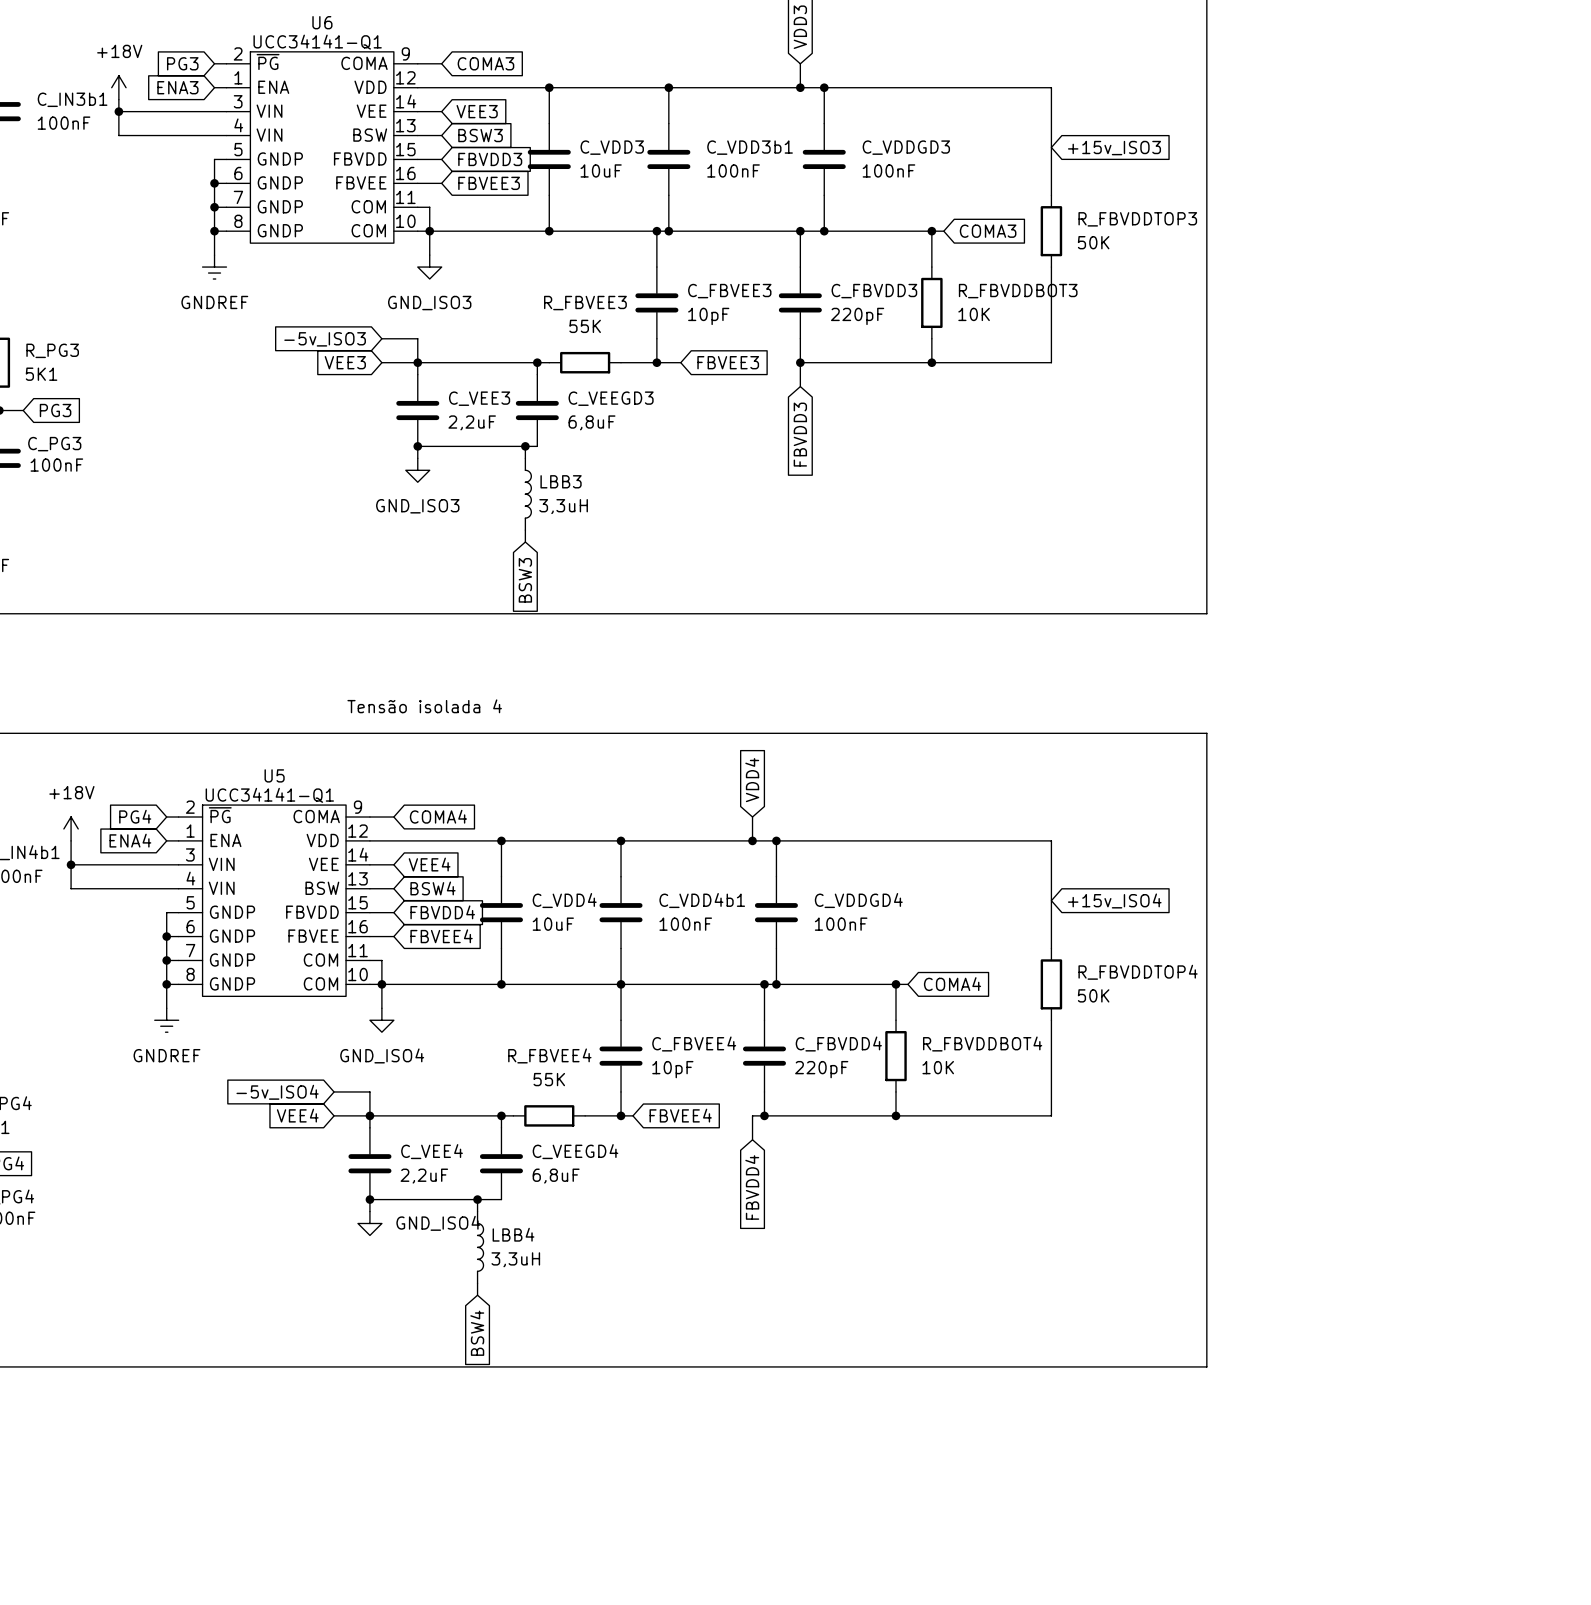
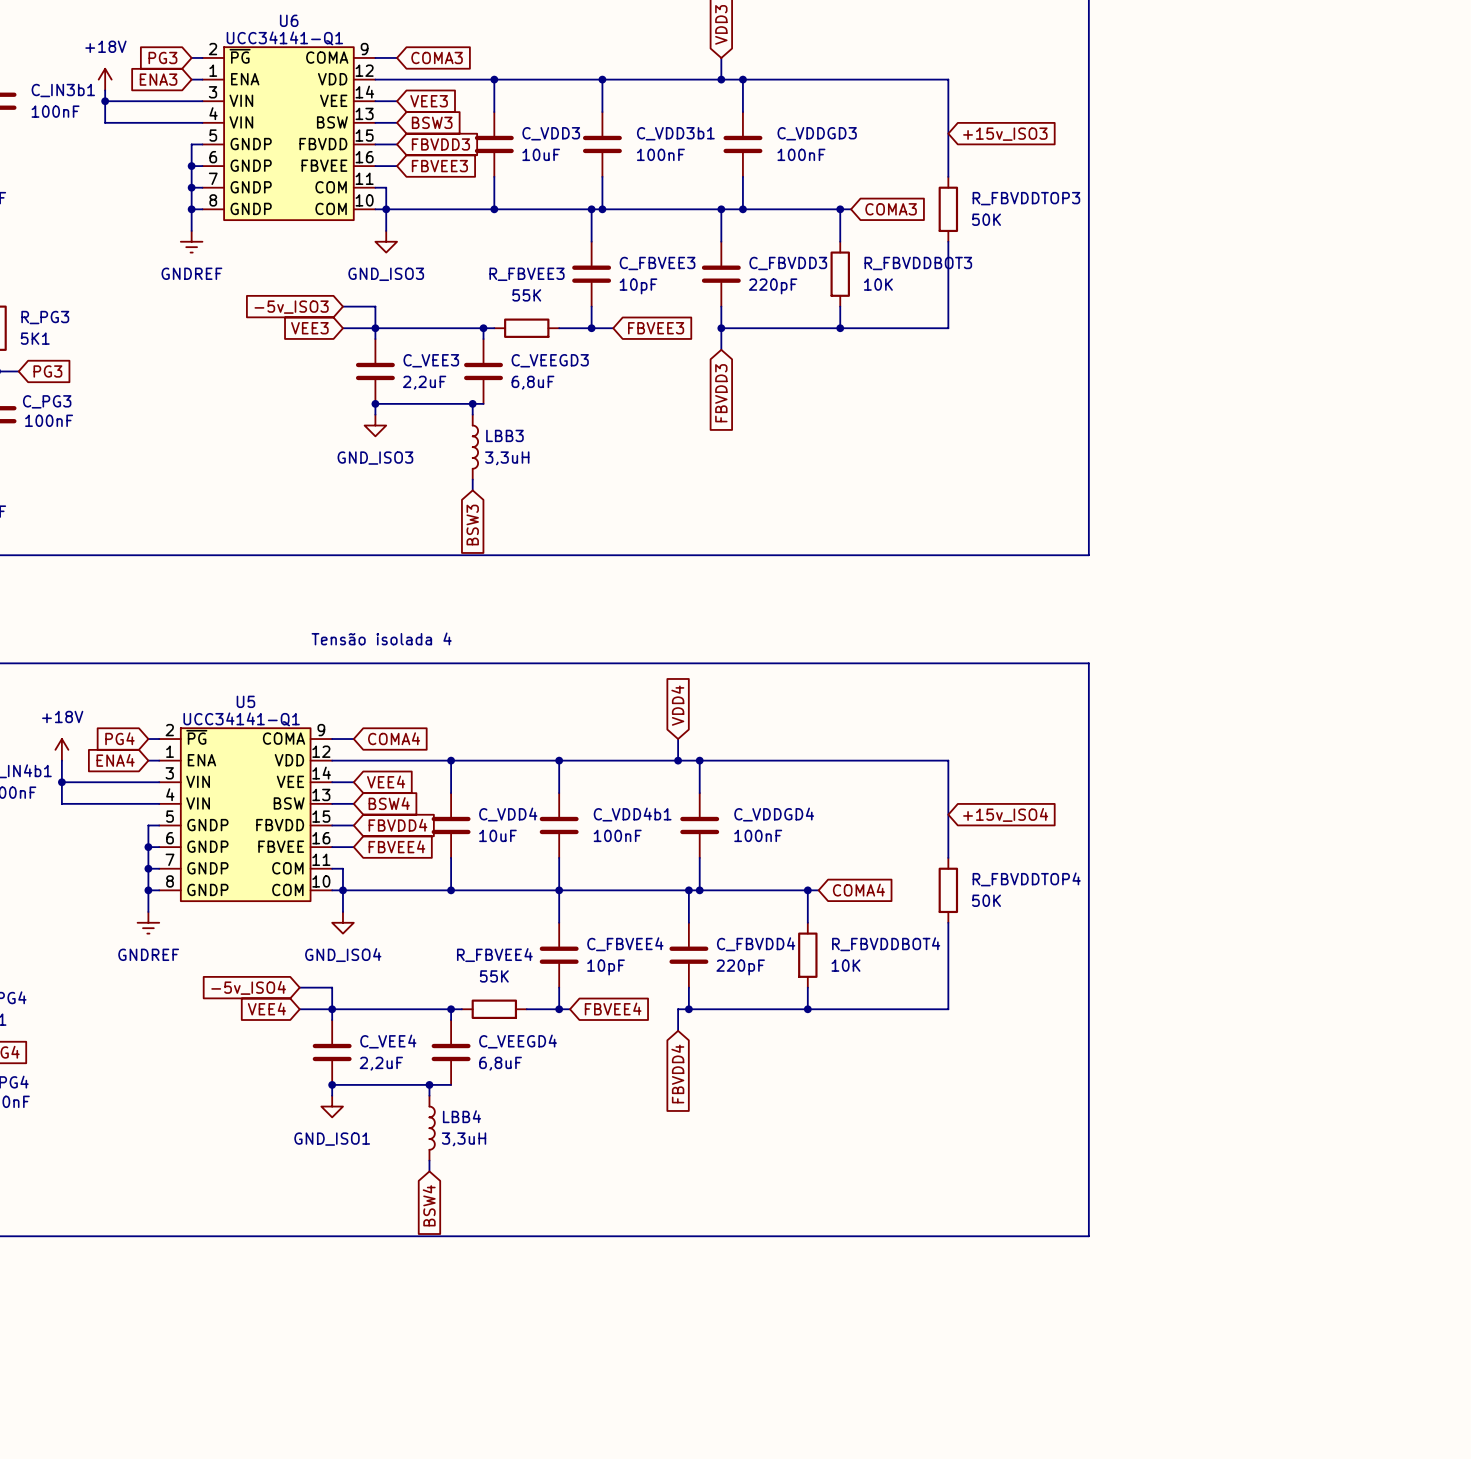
power symbol: GND_ISO4 (369, 1223) -> GND_ISO1 (332, 1106)

